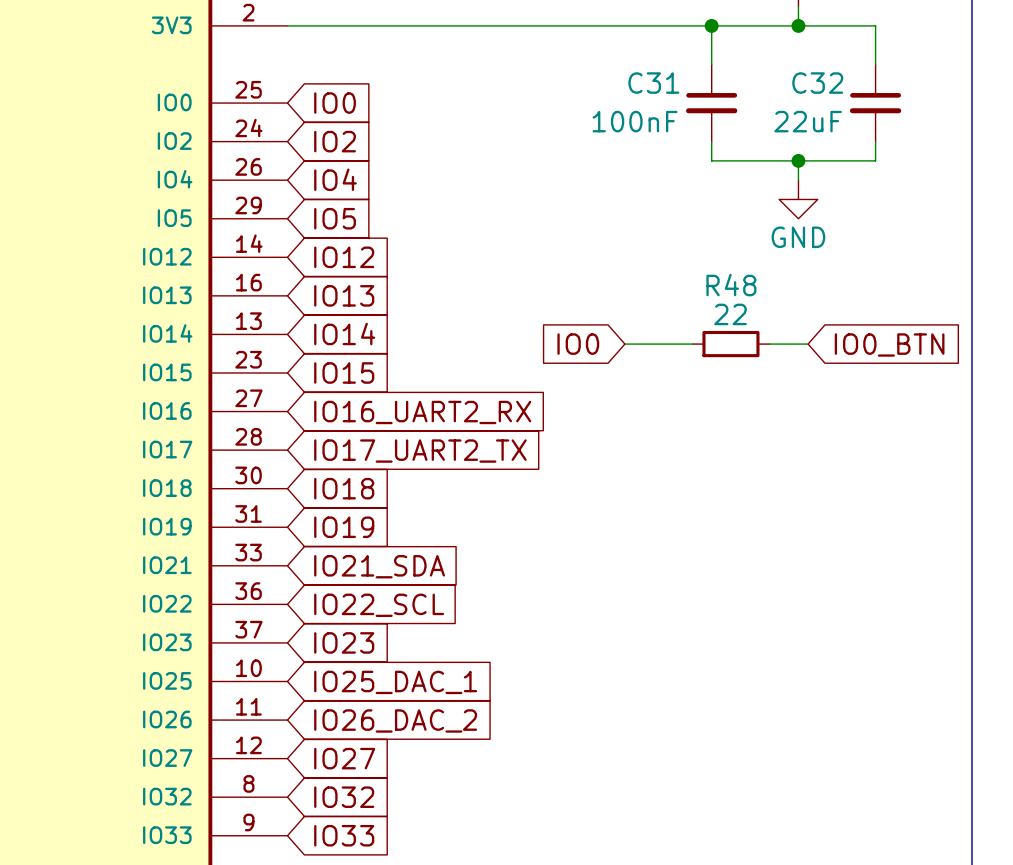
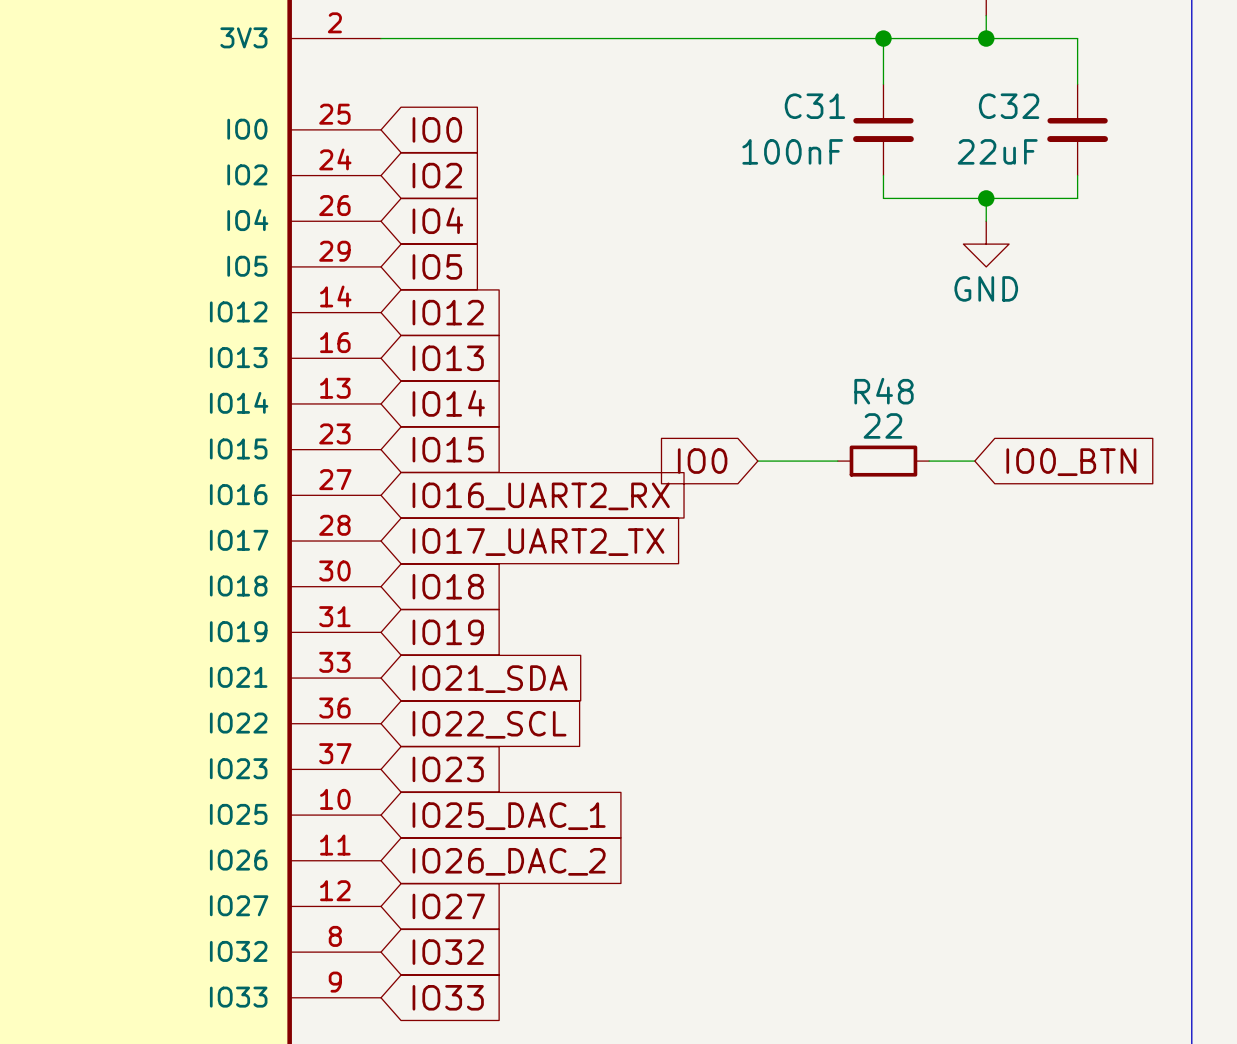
global label position: IO0 (578, 344) -> IO0 (702, 461)
wire: (624, 344) (692, 344) -> (757, 461) (837, 461)
R48 position: (730, 344) -> (883, 461)
wire: (769, 344) (808, 344) -> (929, 461) (974, 461)
global label position: IO0_BTN (889, 344) -> IO0_BTN (1071, 462)

